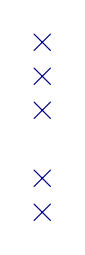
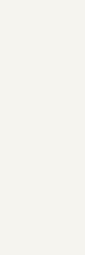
no-connect mark: (42, 42) -> none
no-connect mark: (42, 76) -> none
no-connect mark: (42, 110) -> none
no-connect mark: (42, 178) -> none
no-connect mark: (42, 212) -> none

